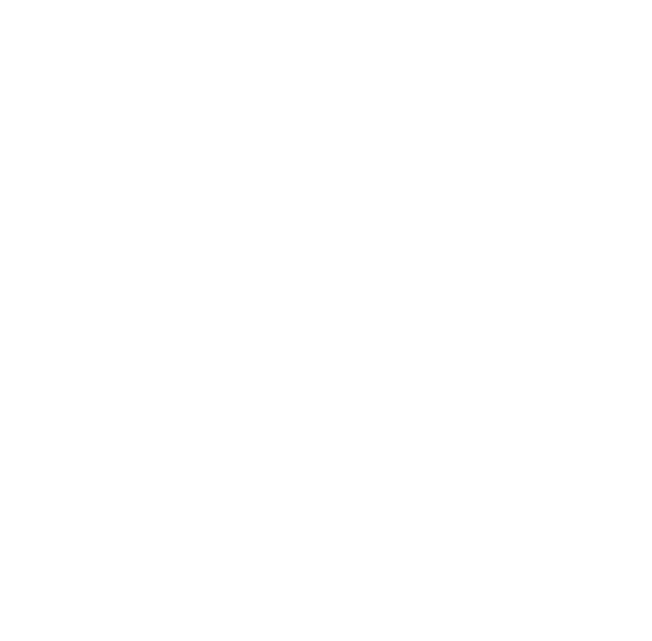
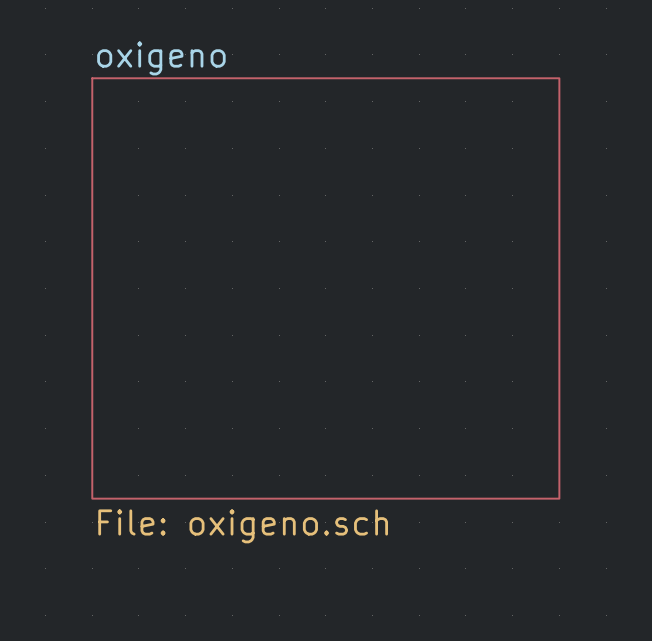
sheet oxigeno: none -> File: oxigeno.sch (325, 288)

